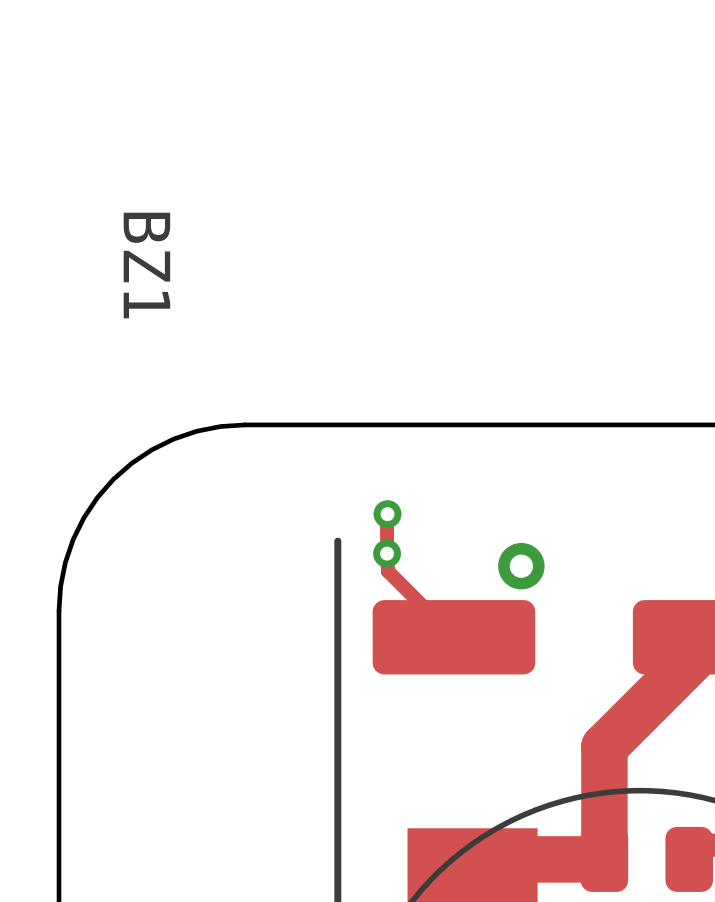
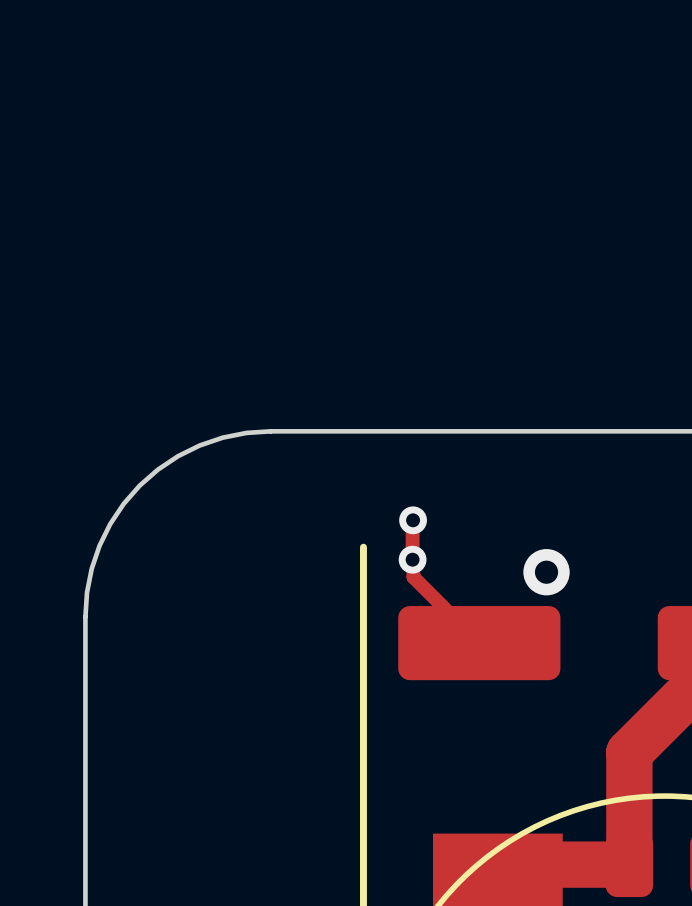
BZ1 name: BZ1 (146, 265) -> none

